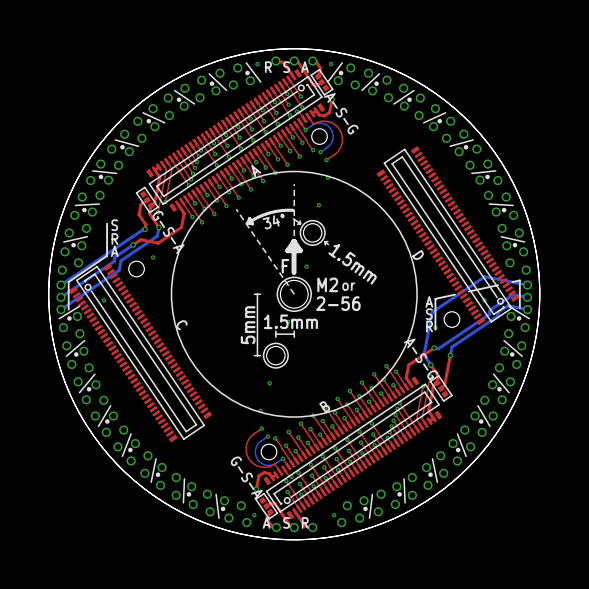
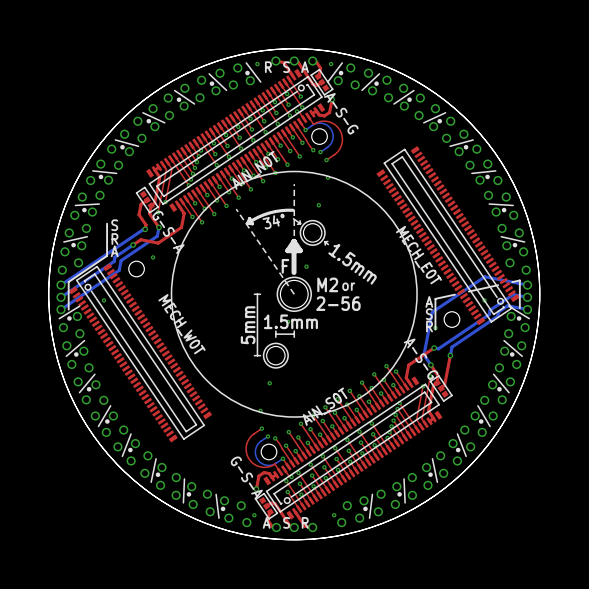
A name: A (256, 171) -> AIN_N0T (255, 170)
D name: D (418, 254) -> MECH_E0T (418, 255)
C name: C (182, 325) -> MECH_W0T (182, 324)
B name: B (324, 407) -> AIN_S0T (325, 406)

